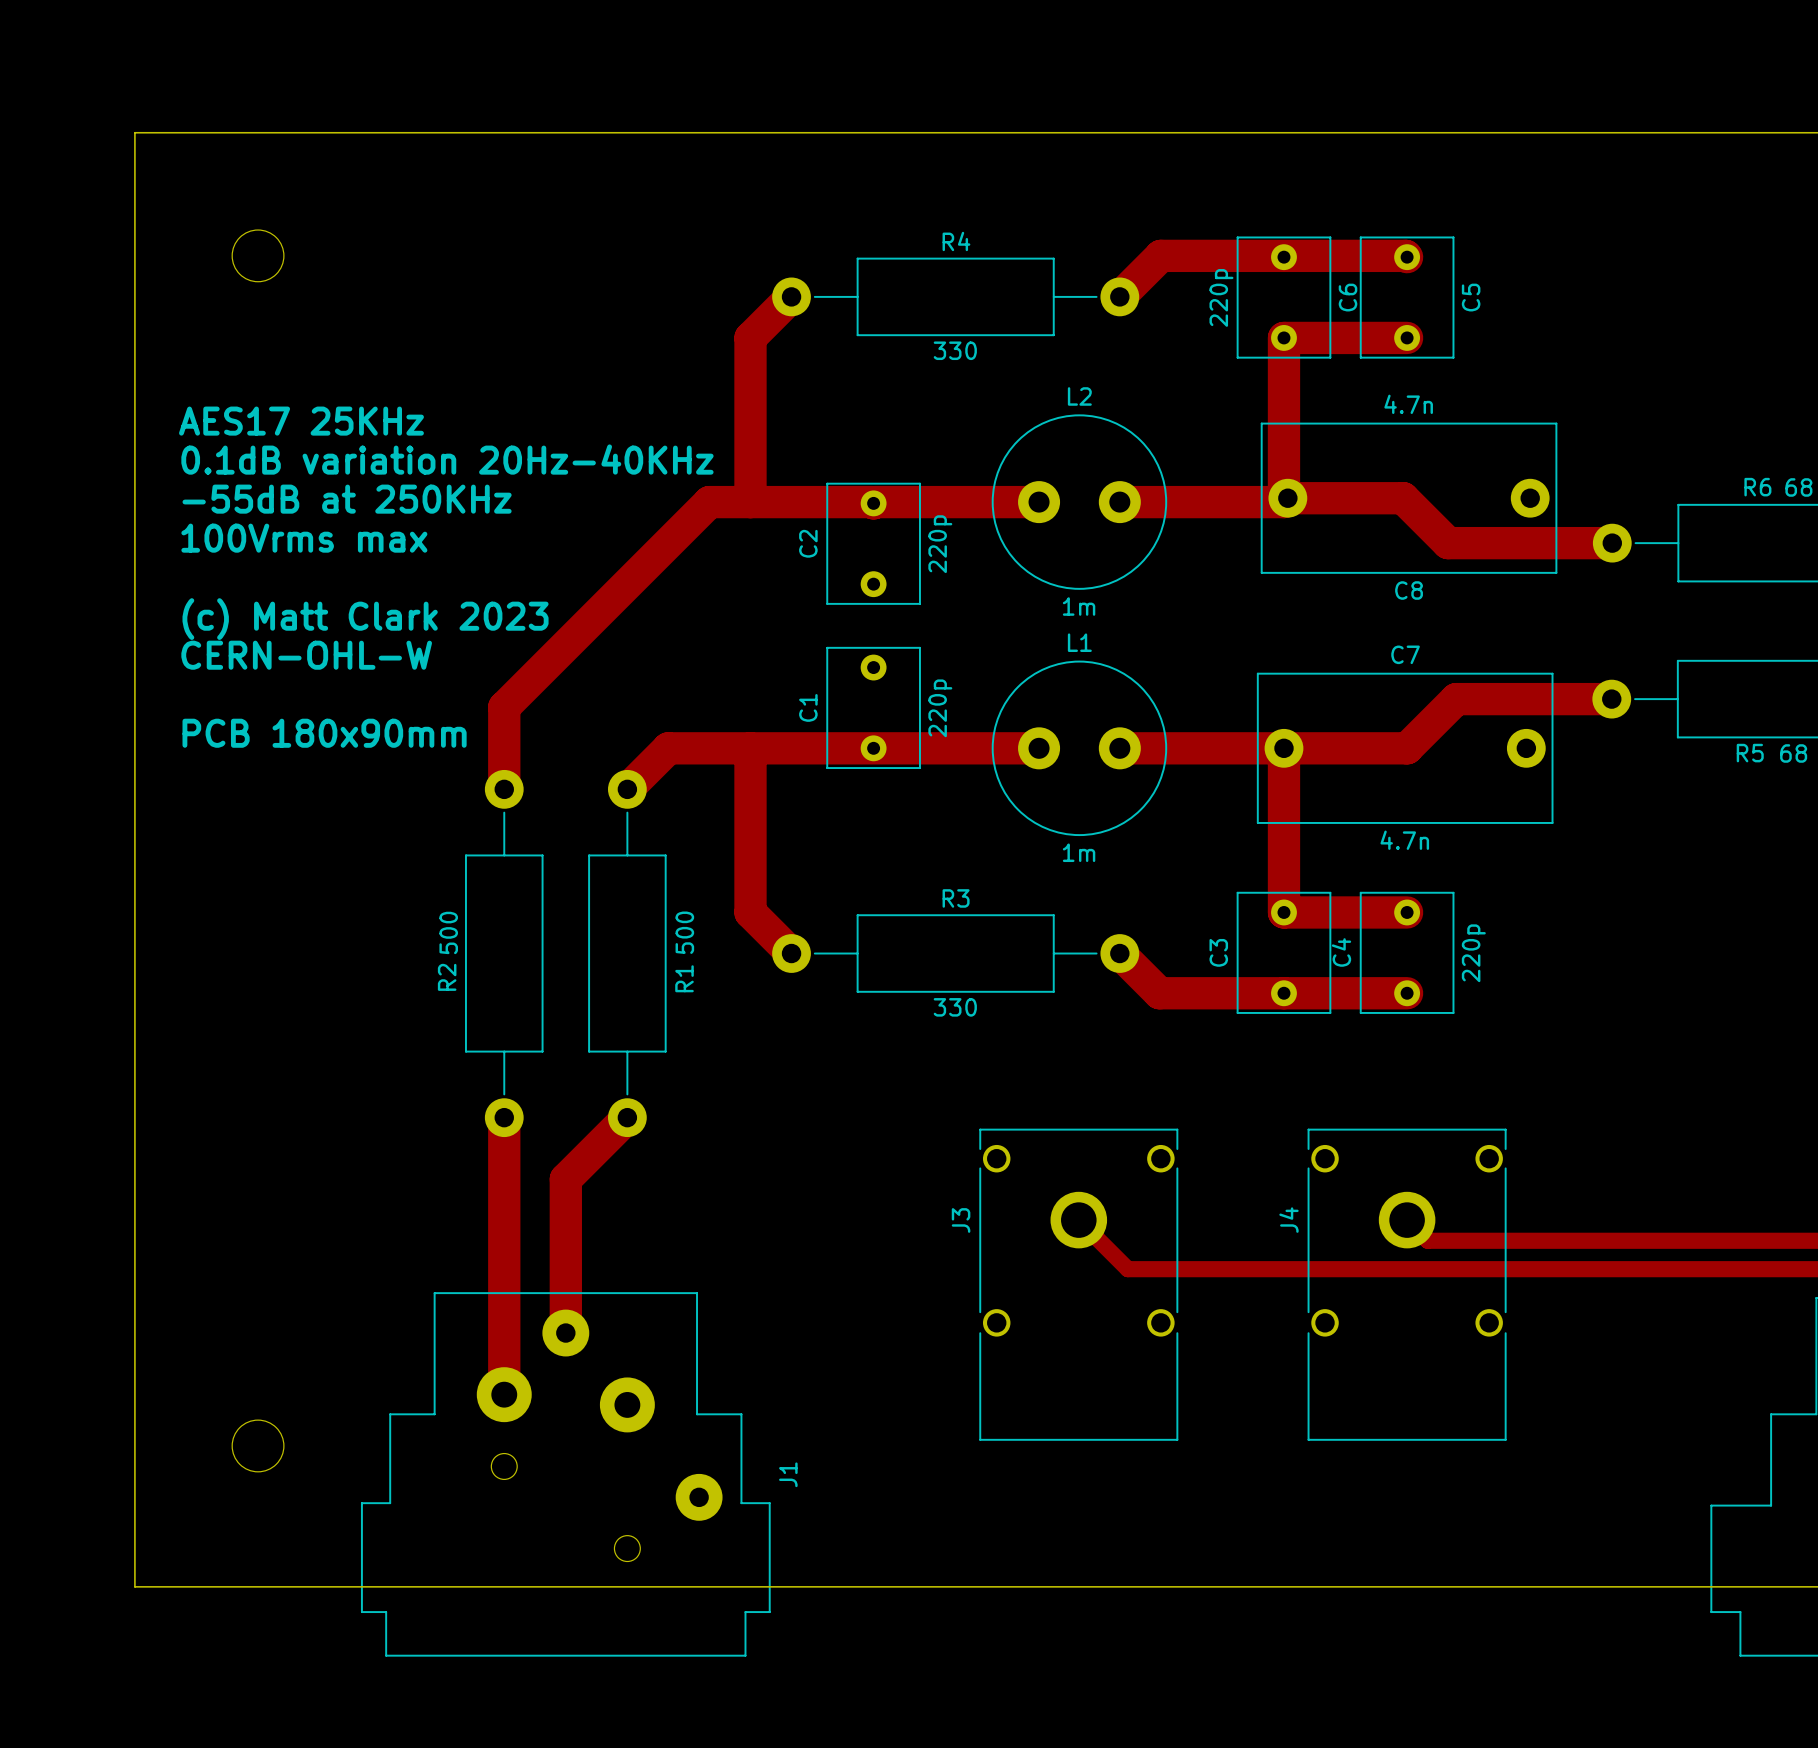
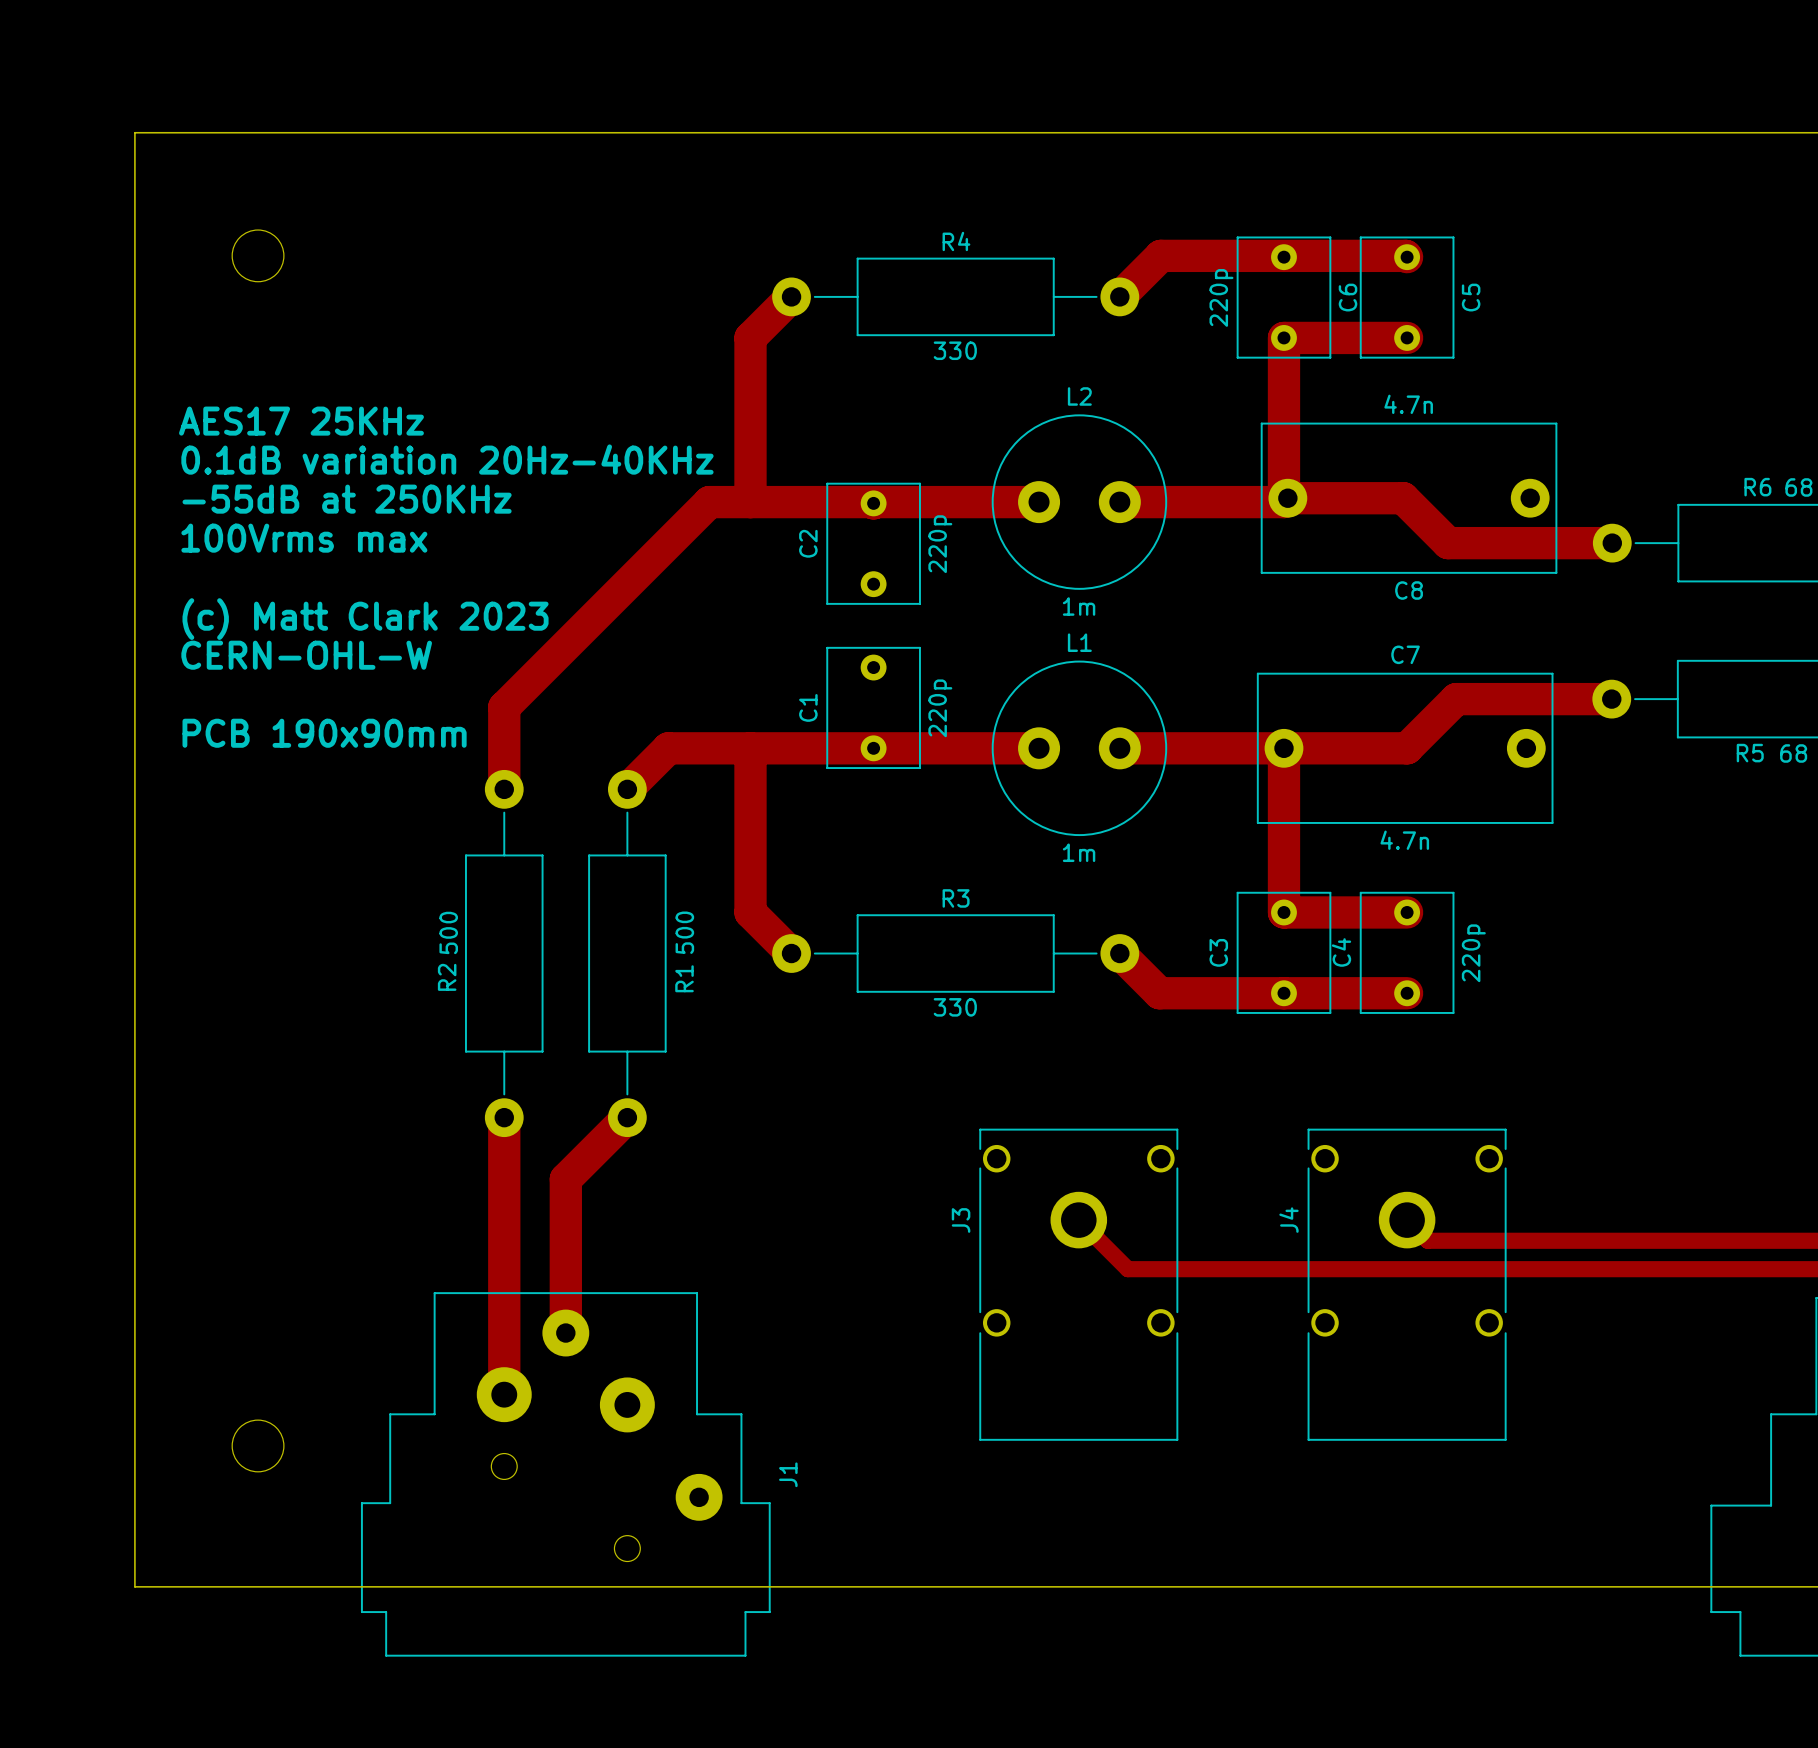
text: PCB 180x90mm (324, 733) -> PCB 190x90mm (324, 733)

